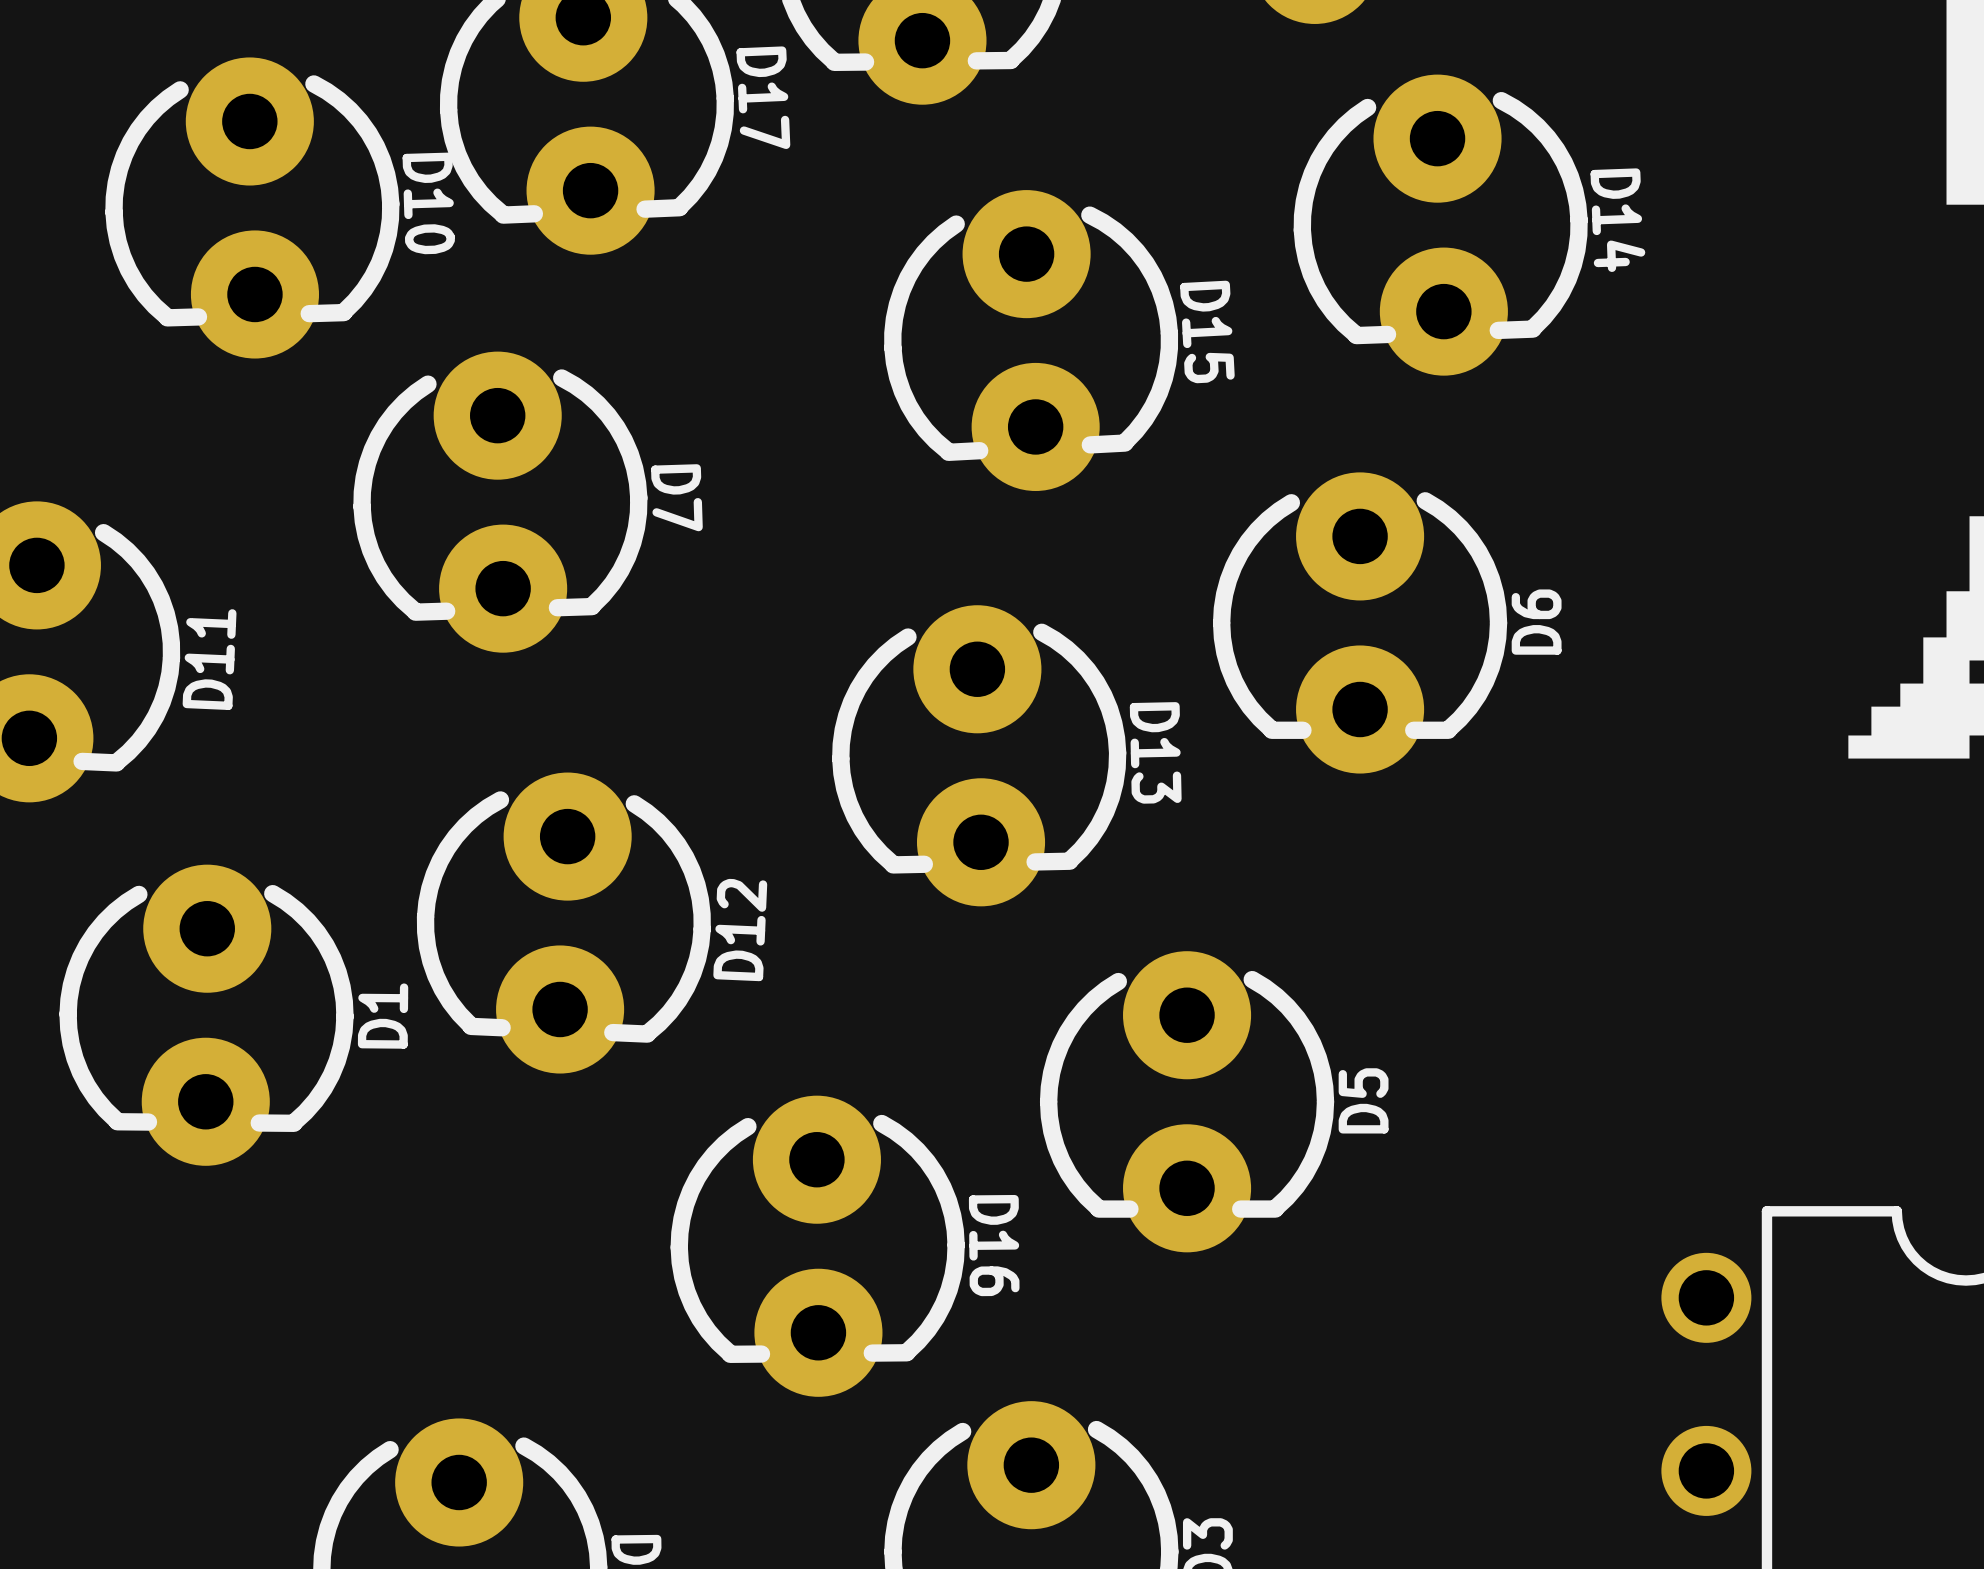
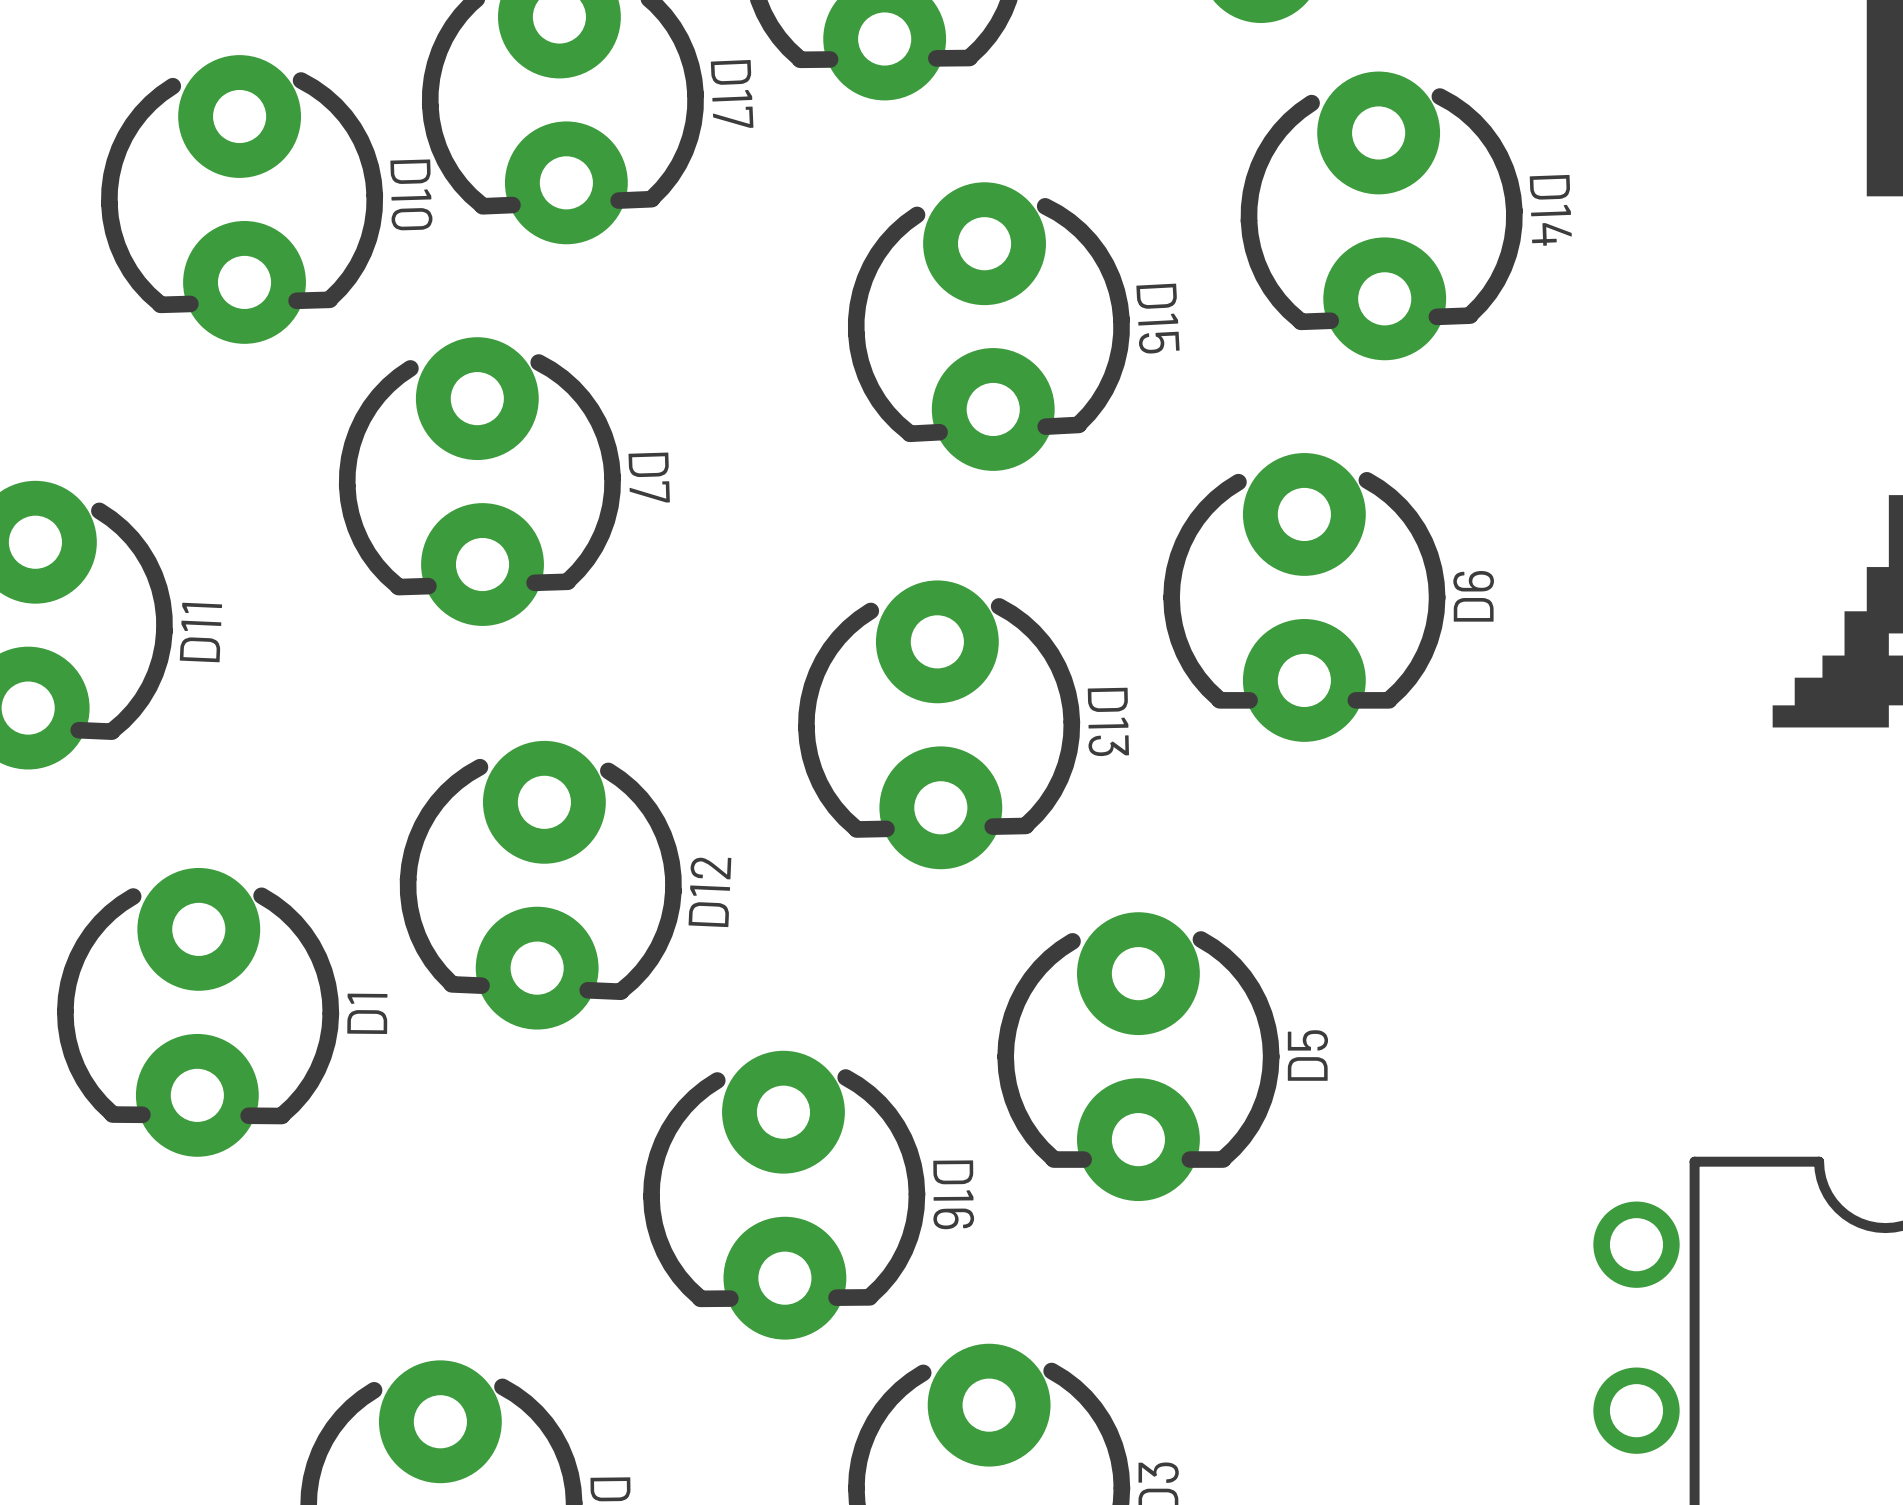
D1 position: (206, 1015) -> (198, 1012)

